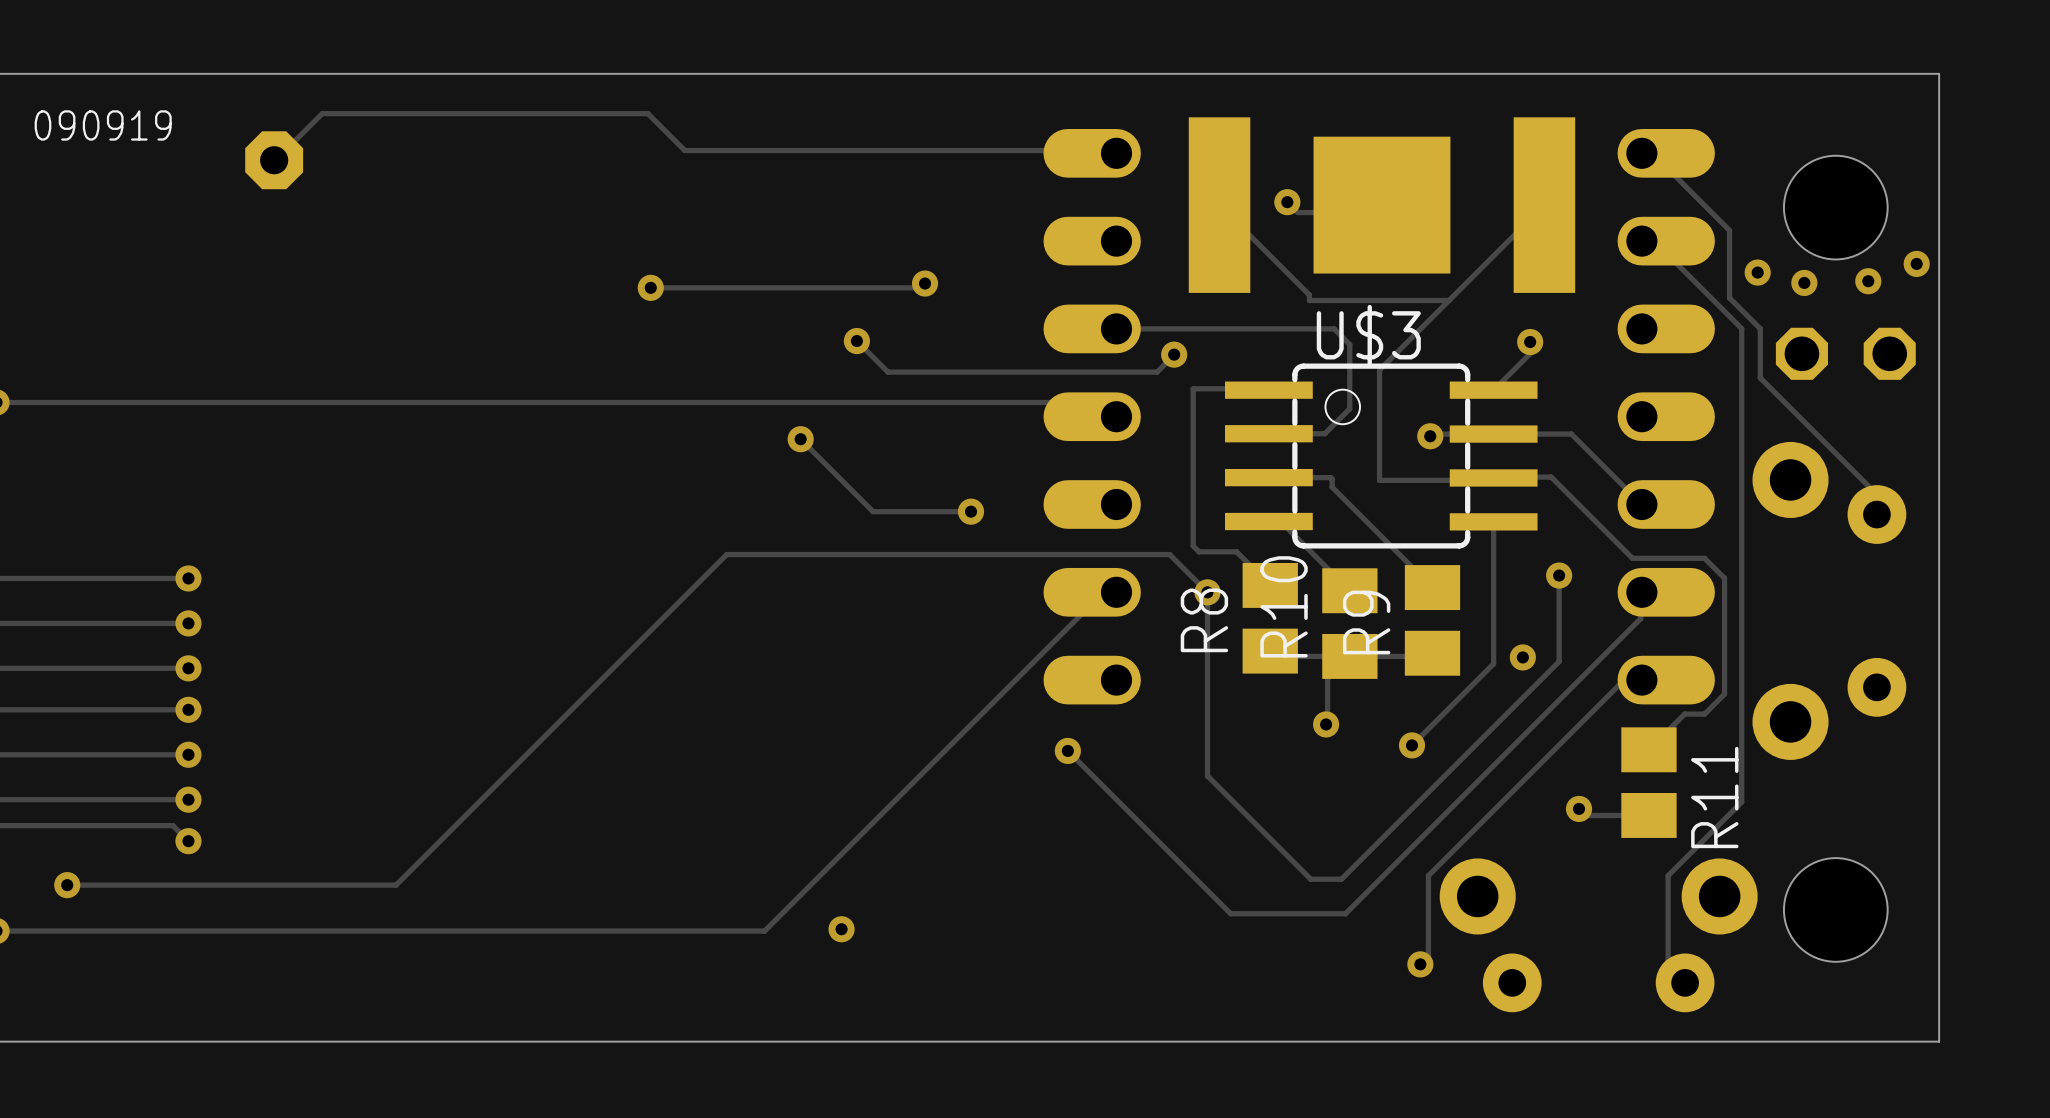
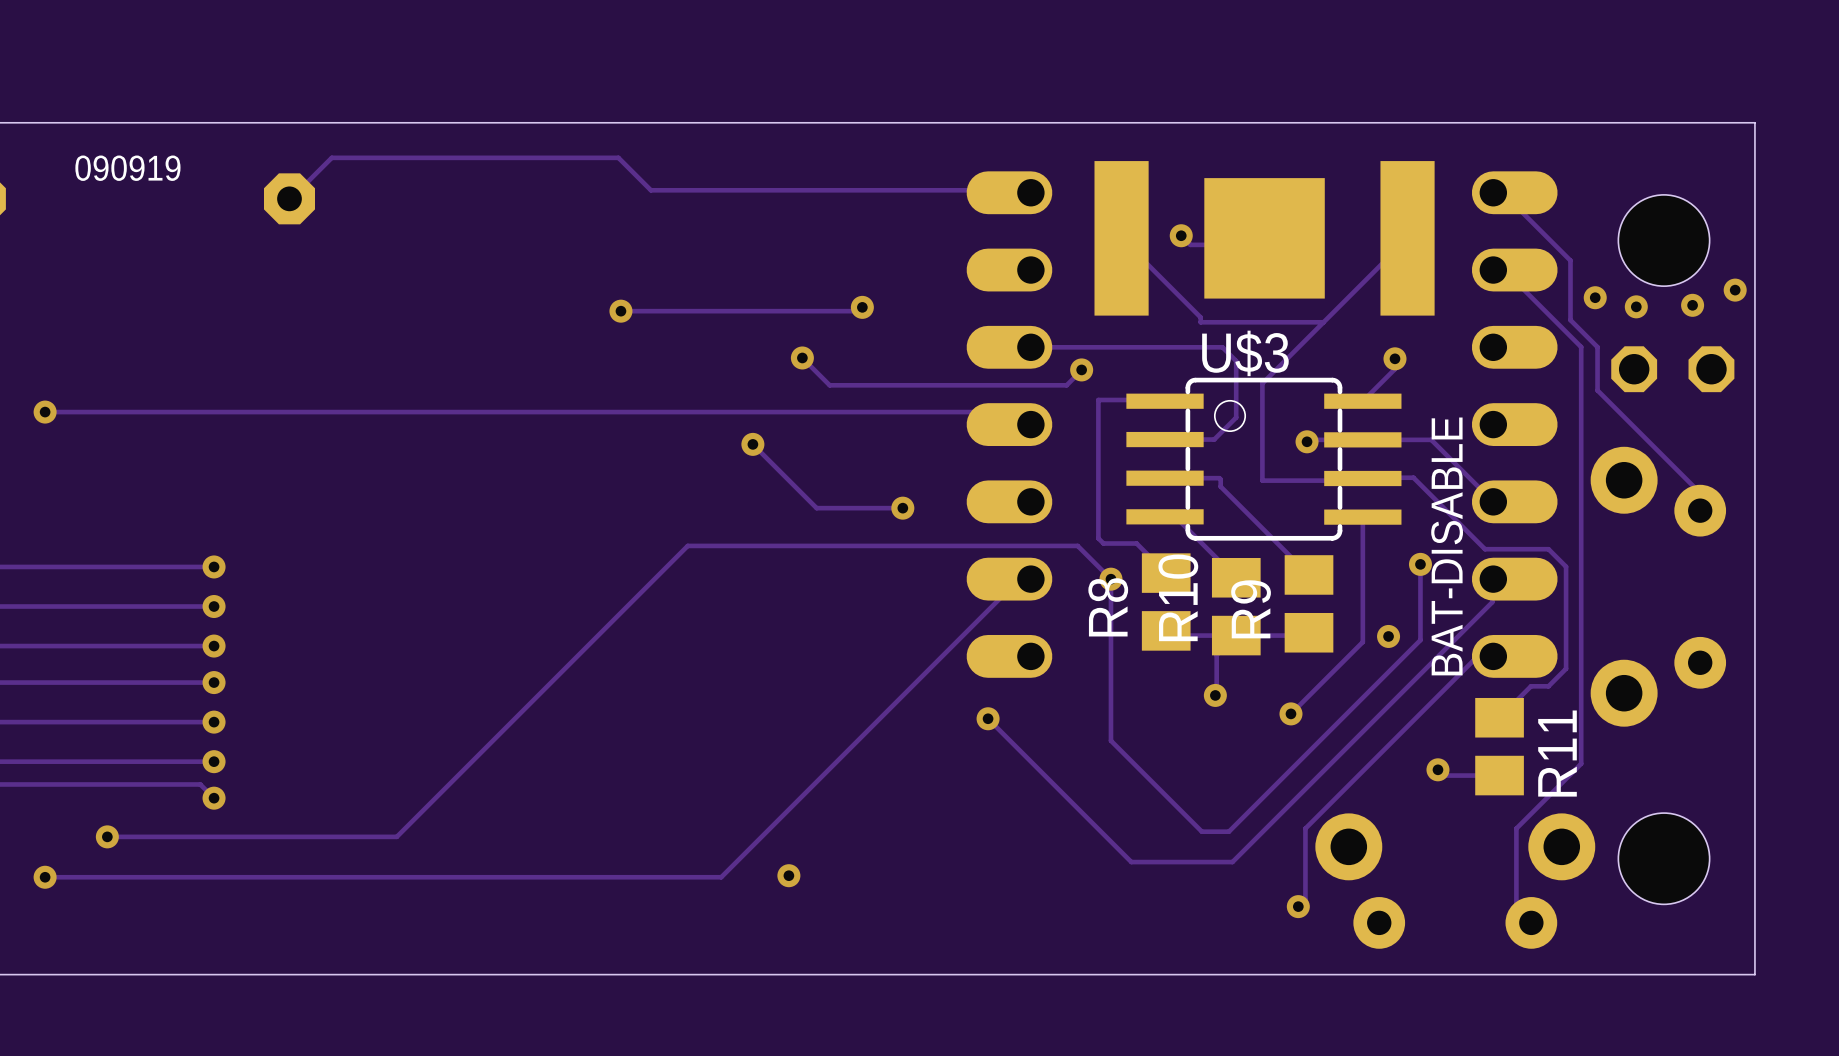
text: none -> BAT-DISABLE (1447, 546)

